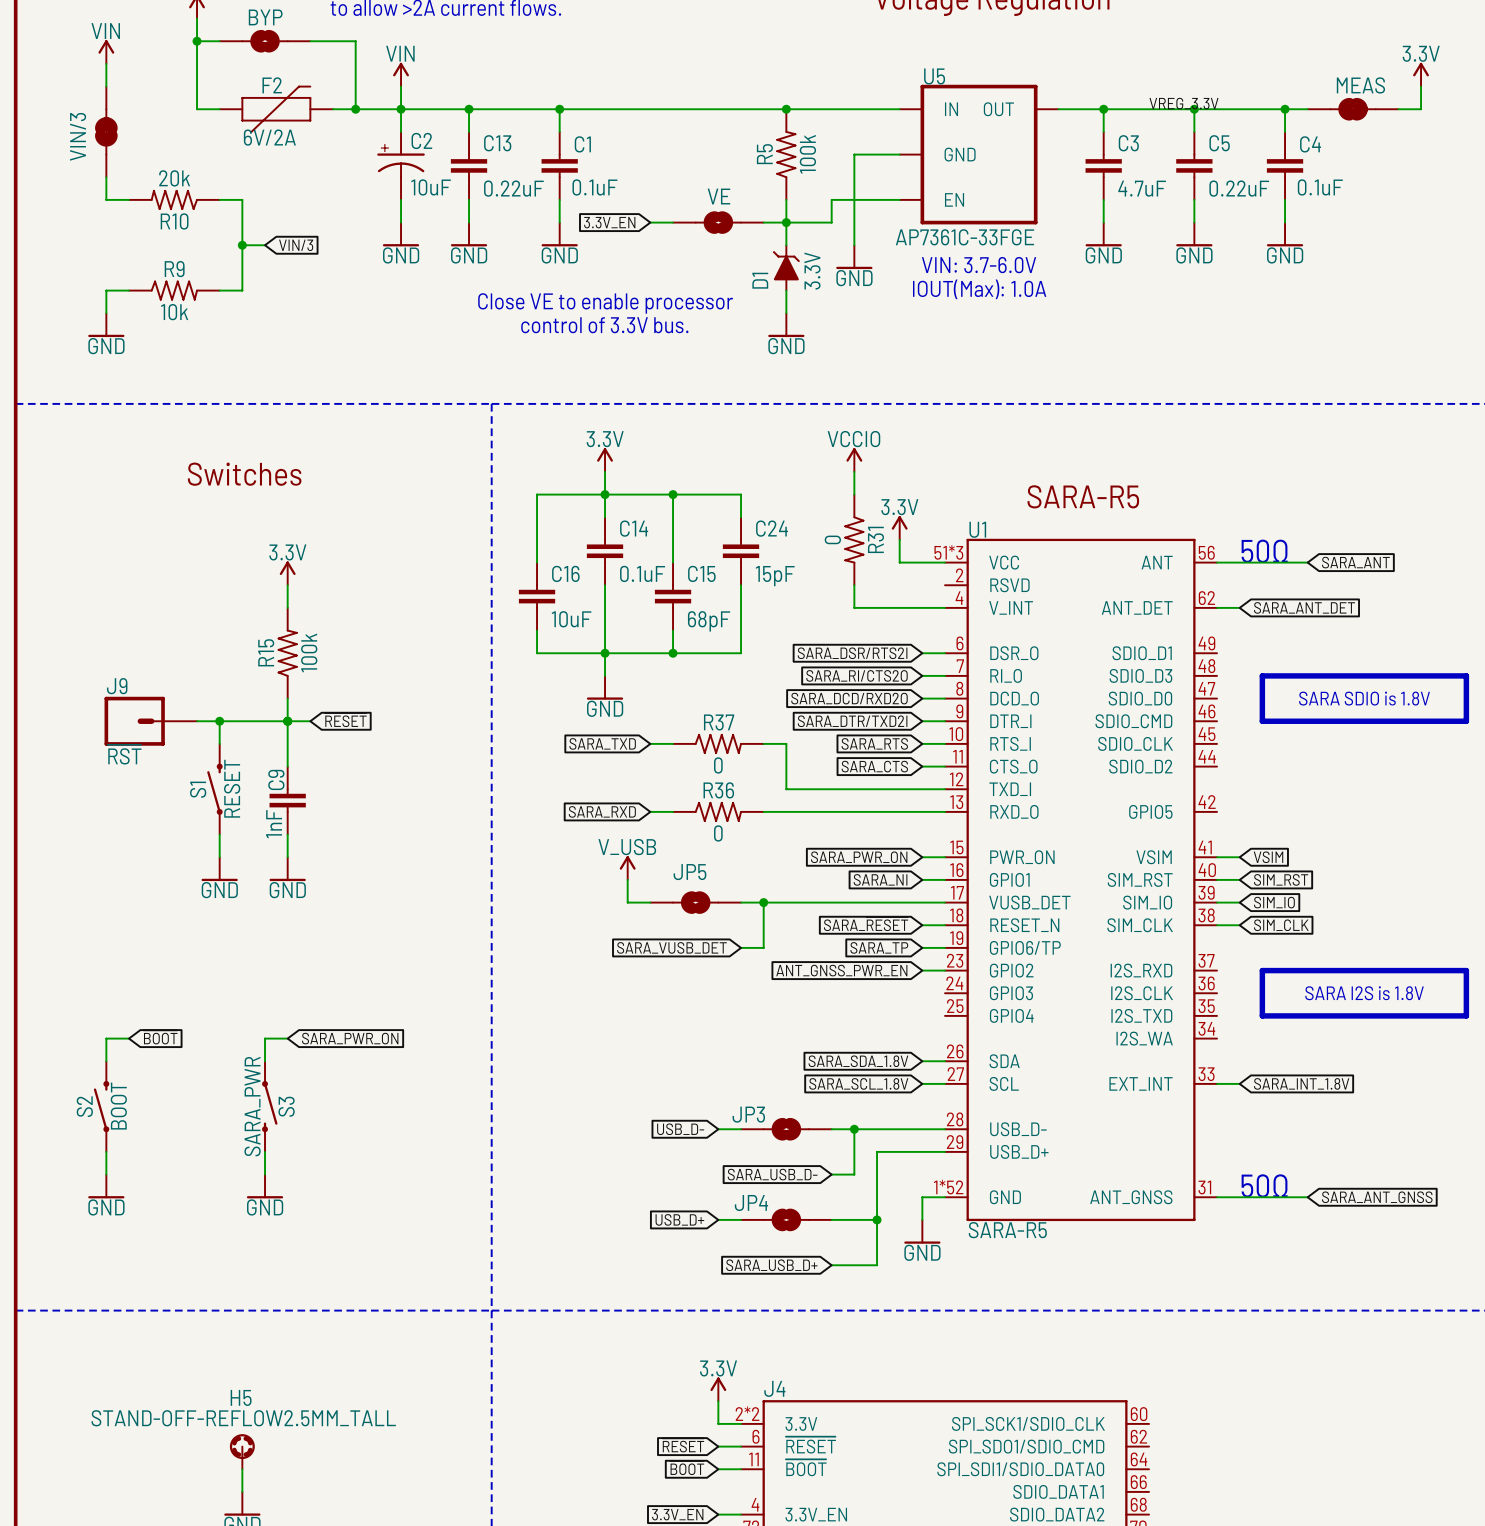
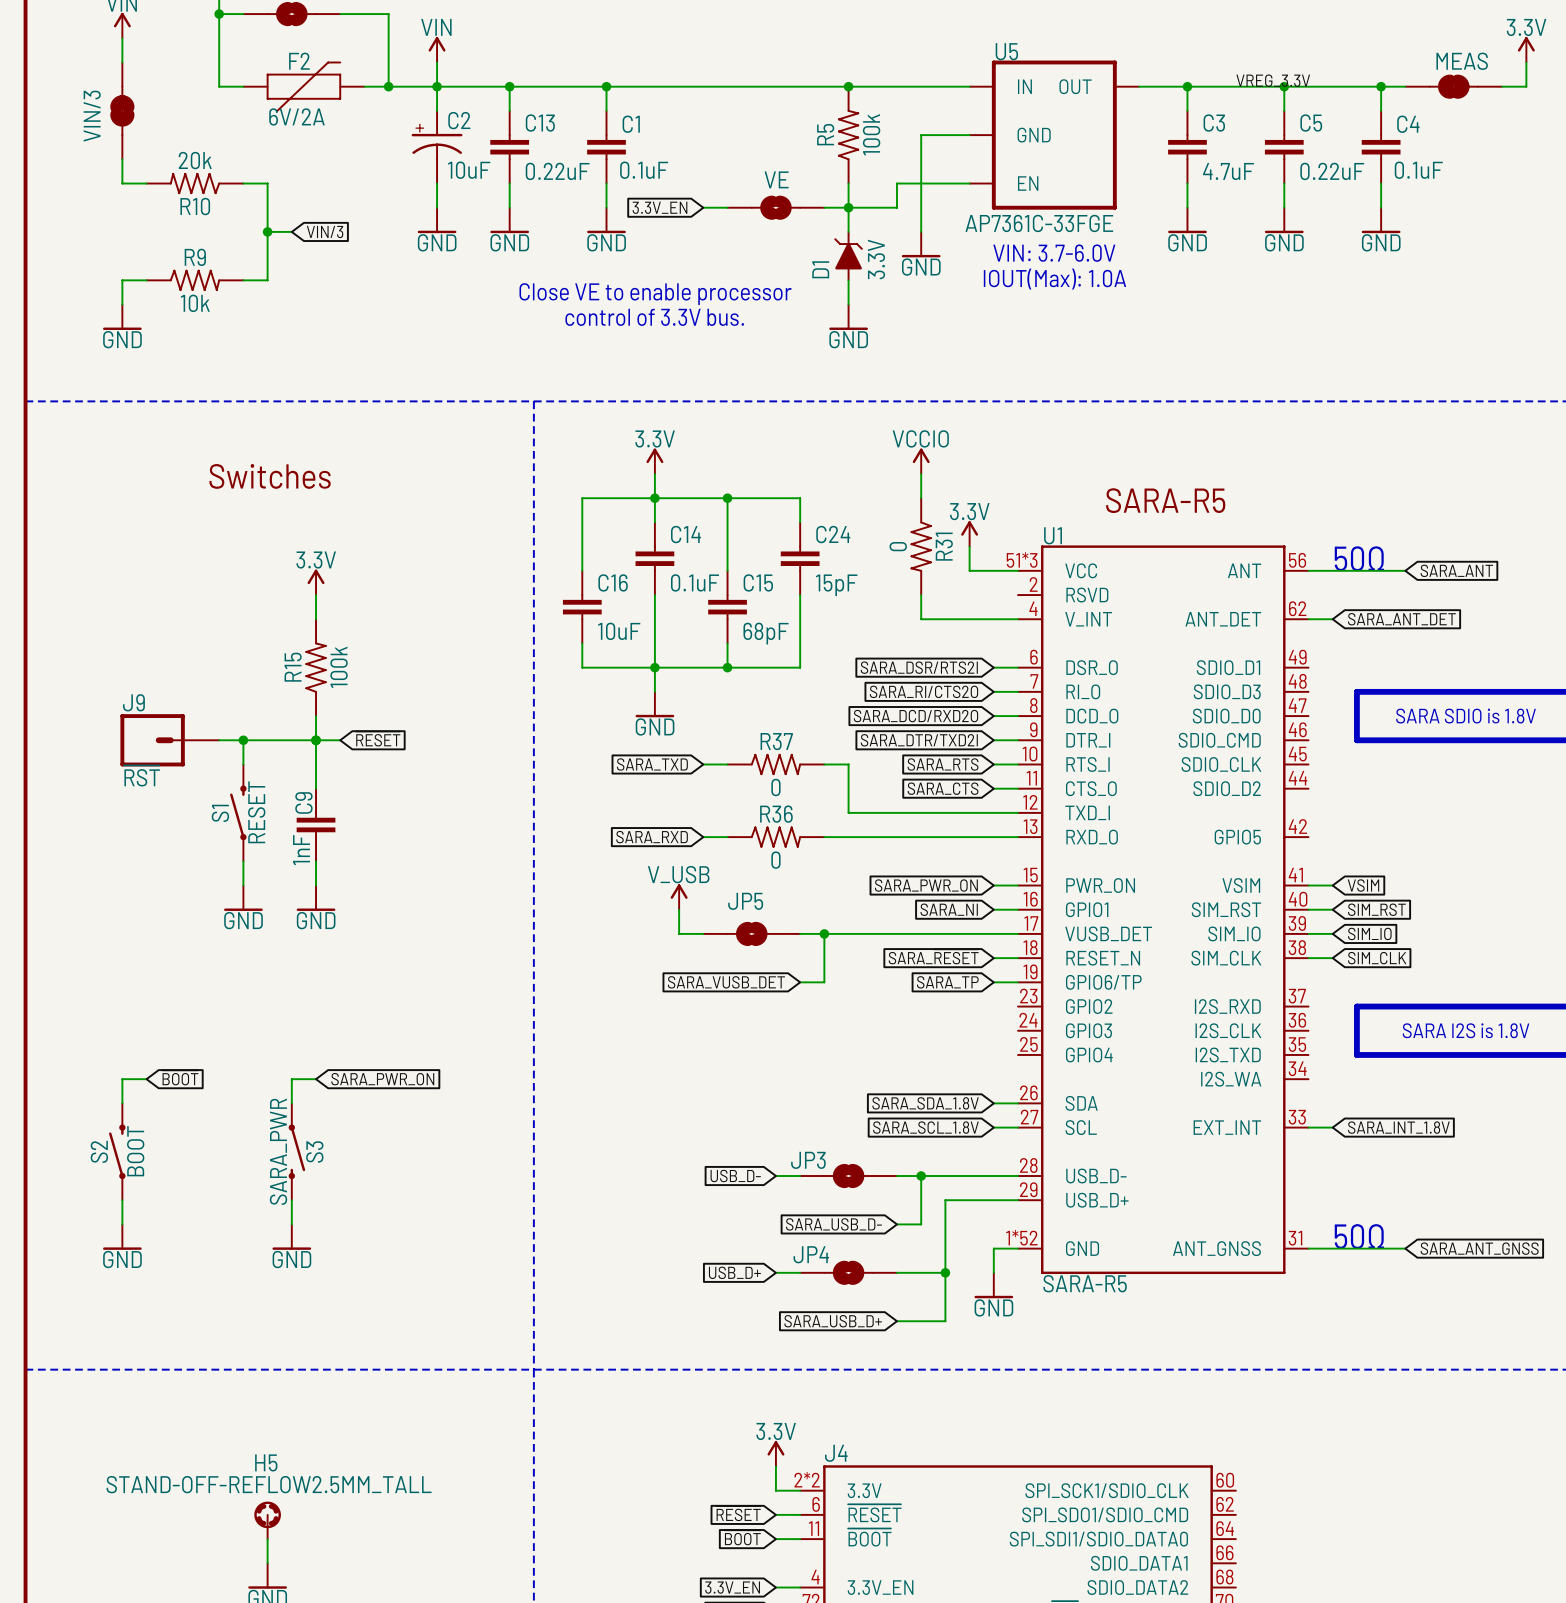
global label: ANT_GNSS_PWR_EN (841, 970) -> none
wire: (922, 970) (945, 970) -> none

